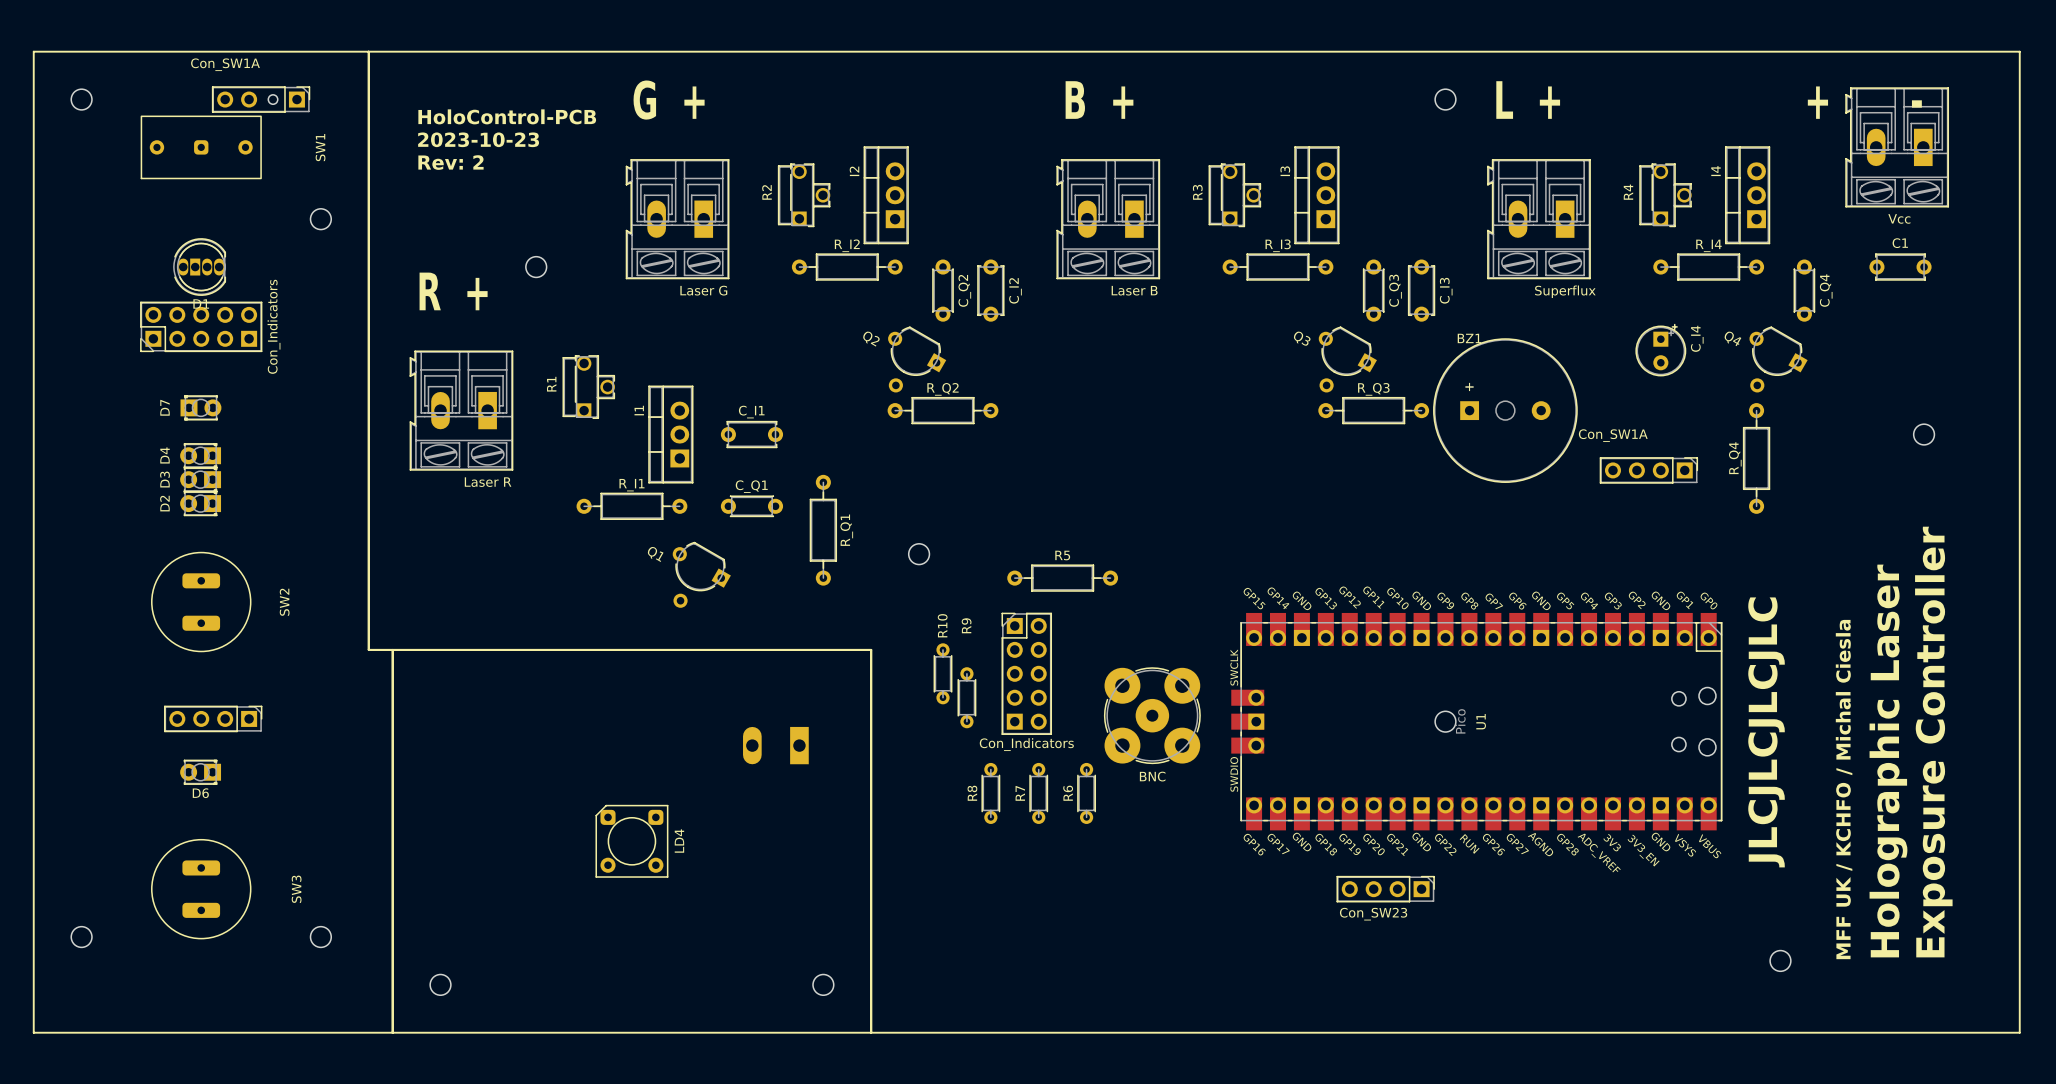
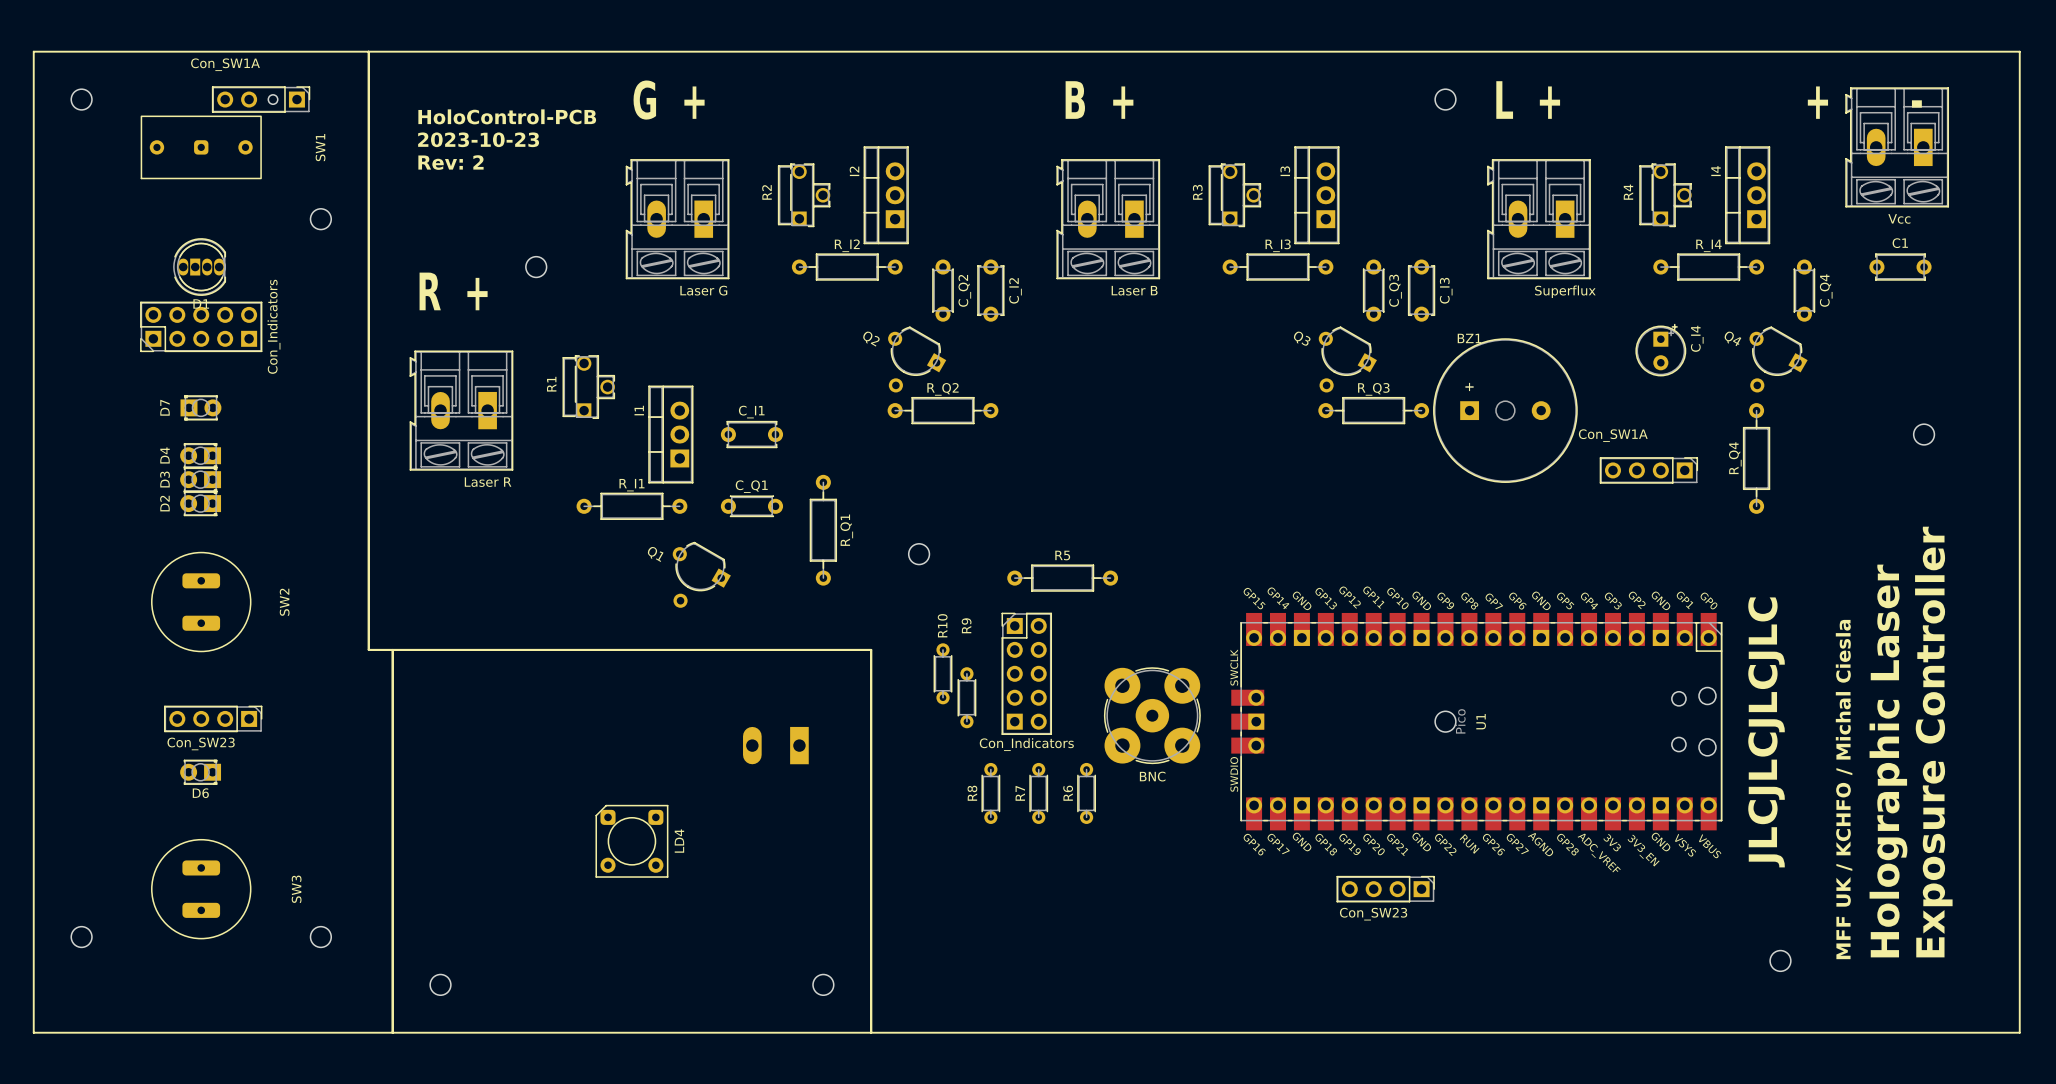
part value: none -> Con_SW23 (201, 743)

